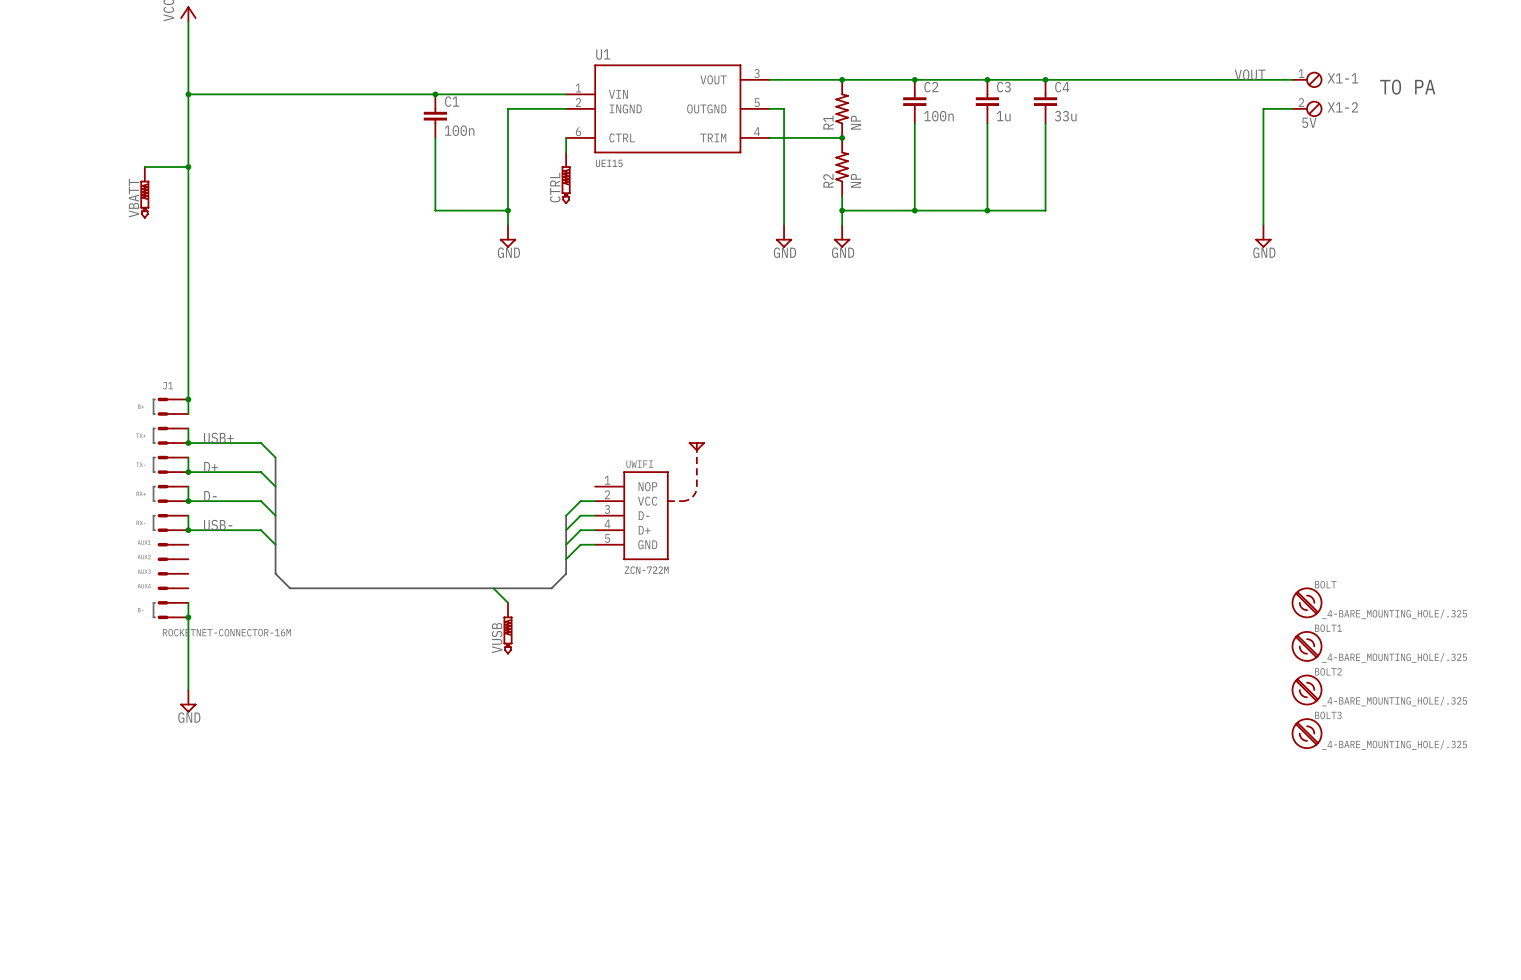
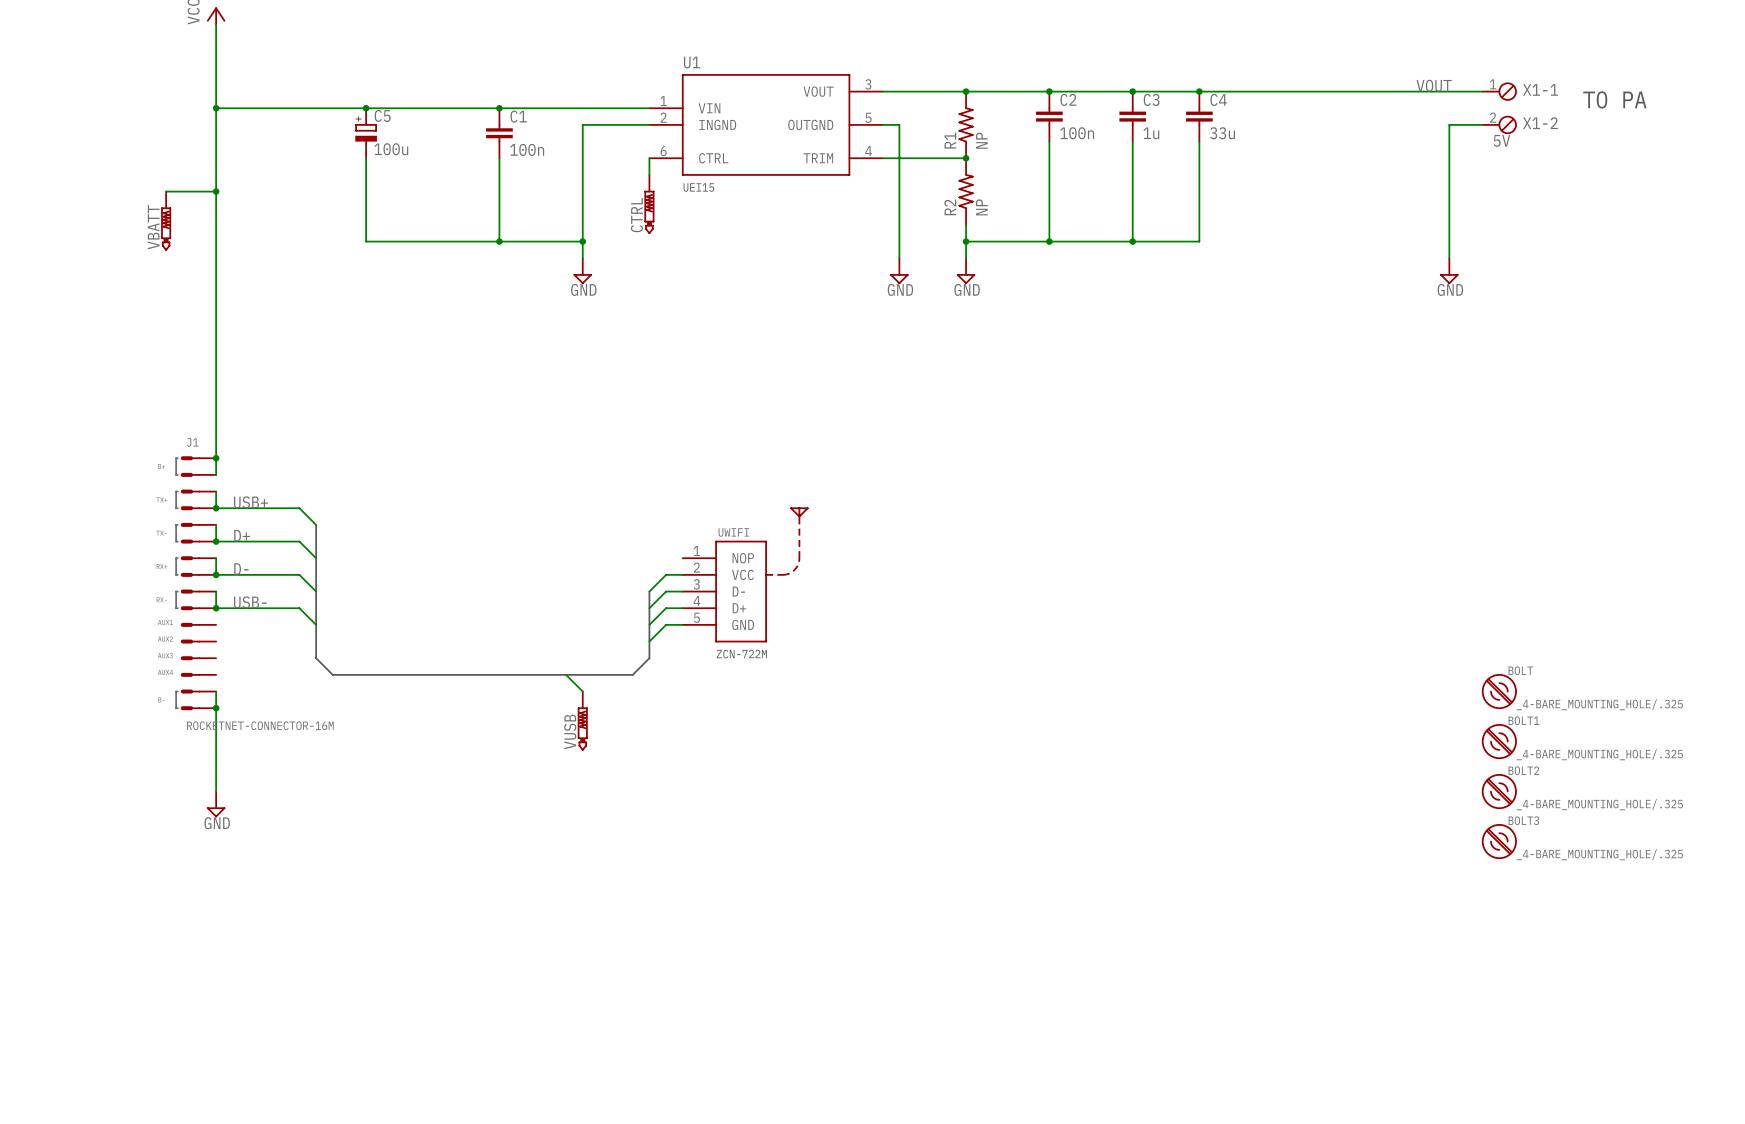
junction: none -> (366, 108)
C5: none -> 100u (366, 133)
wire: none -> (366, 158) (366, 241) (499, 241)
junction: none -> (499, 241)

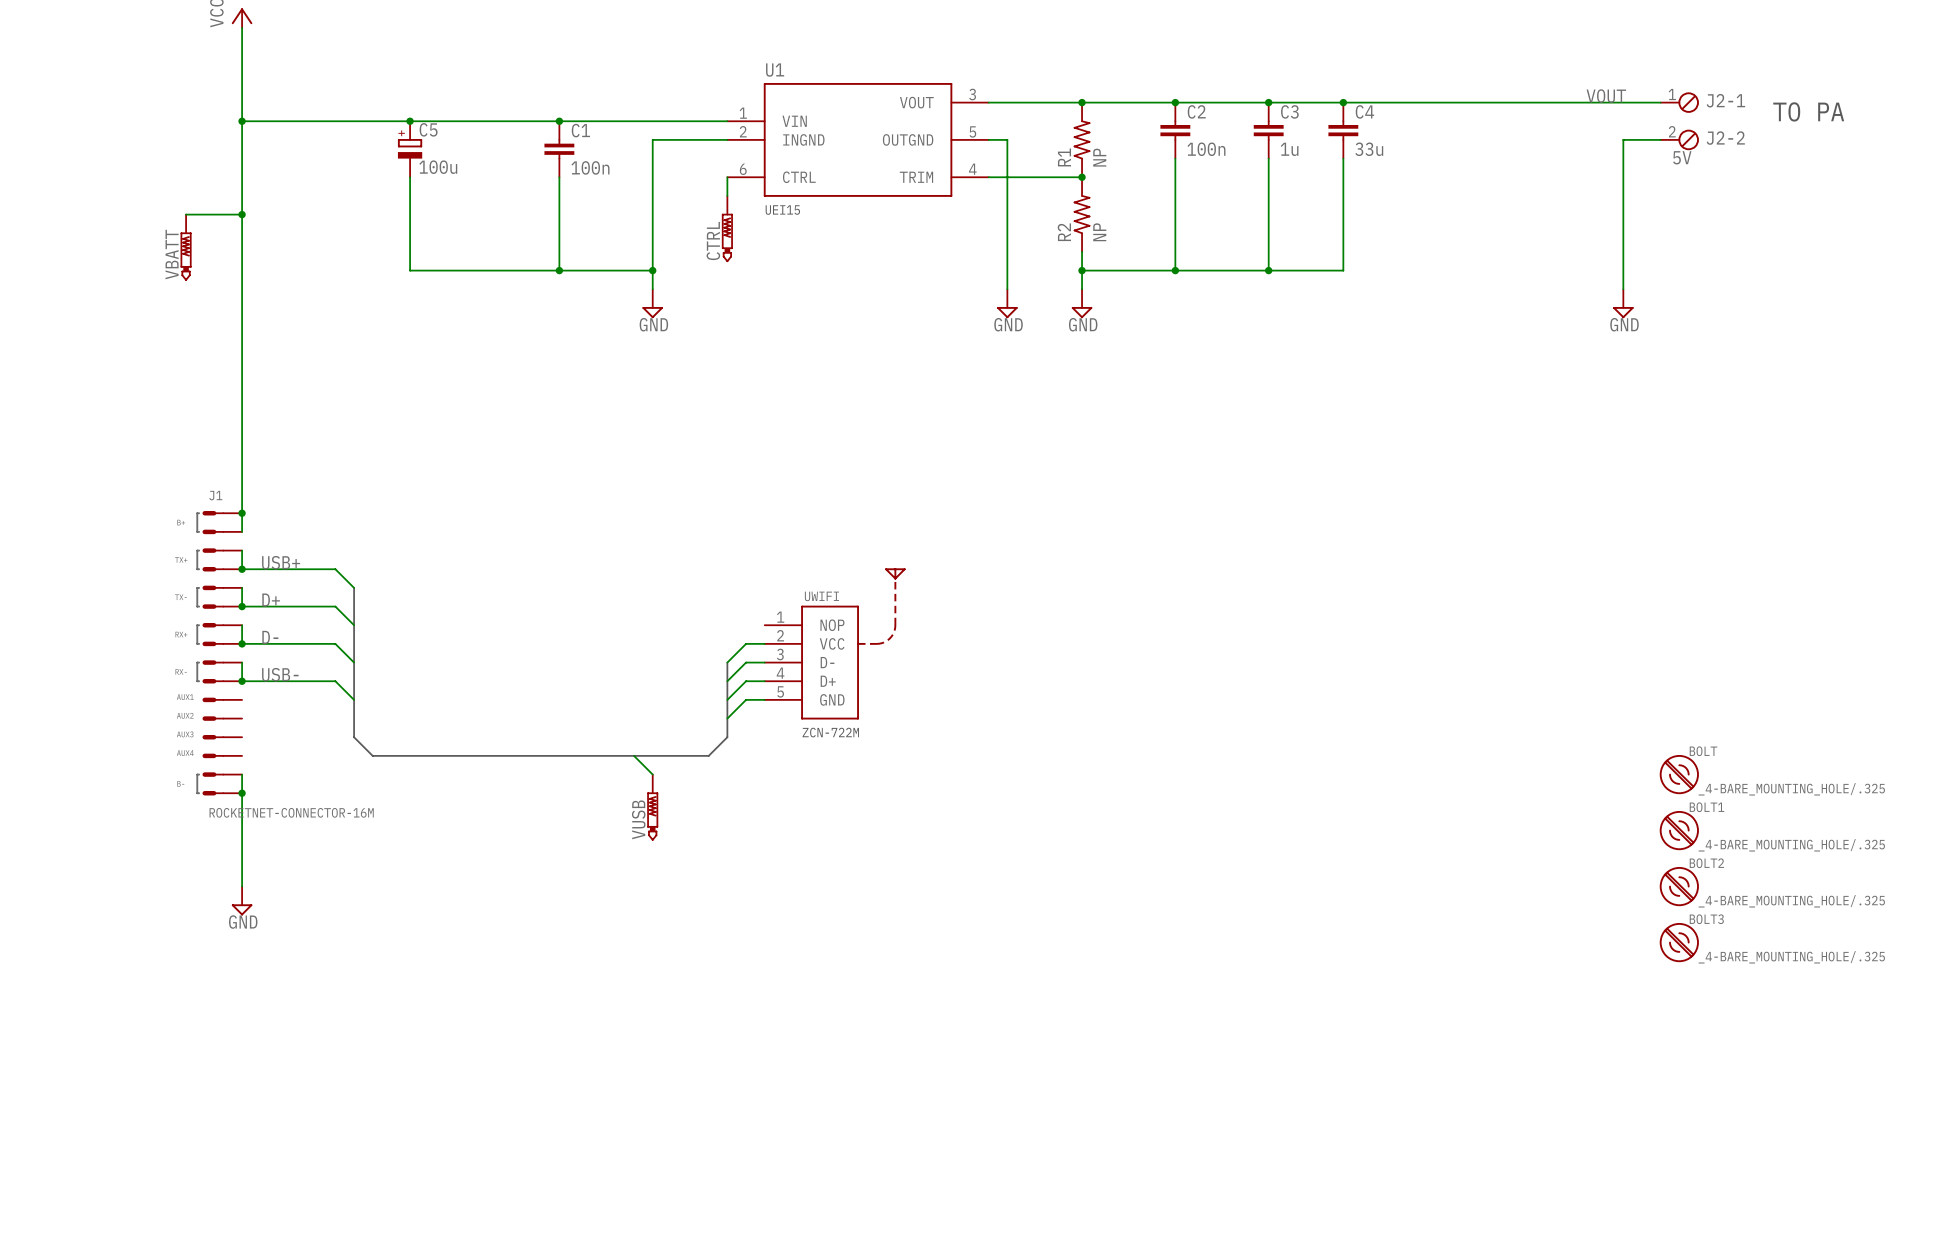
X1-1 name: X1-1 (1540, 89) -> J2-1 (1725, 100)
X1-2 name: X1-2 (1540, 123) -> J2-2 (1725, 138)

